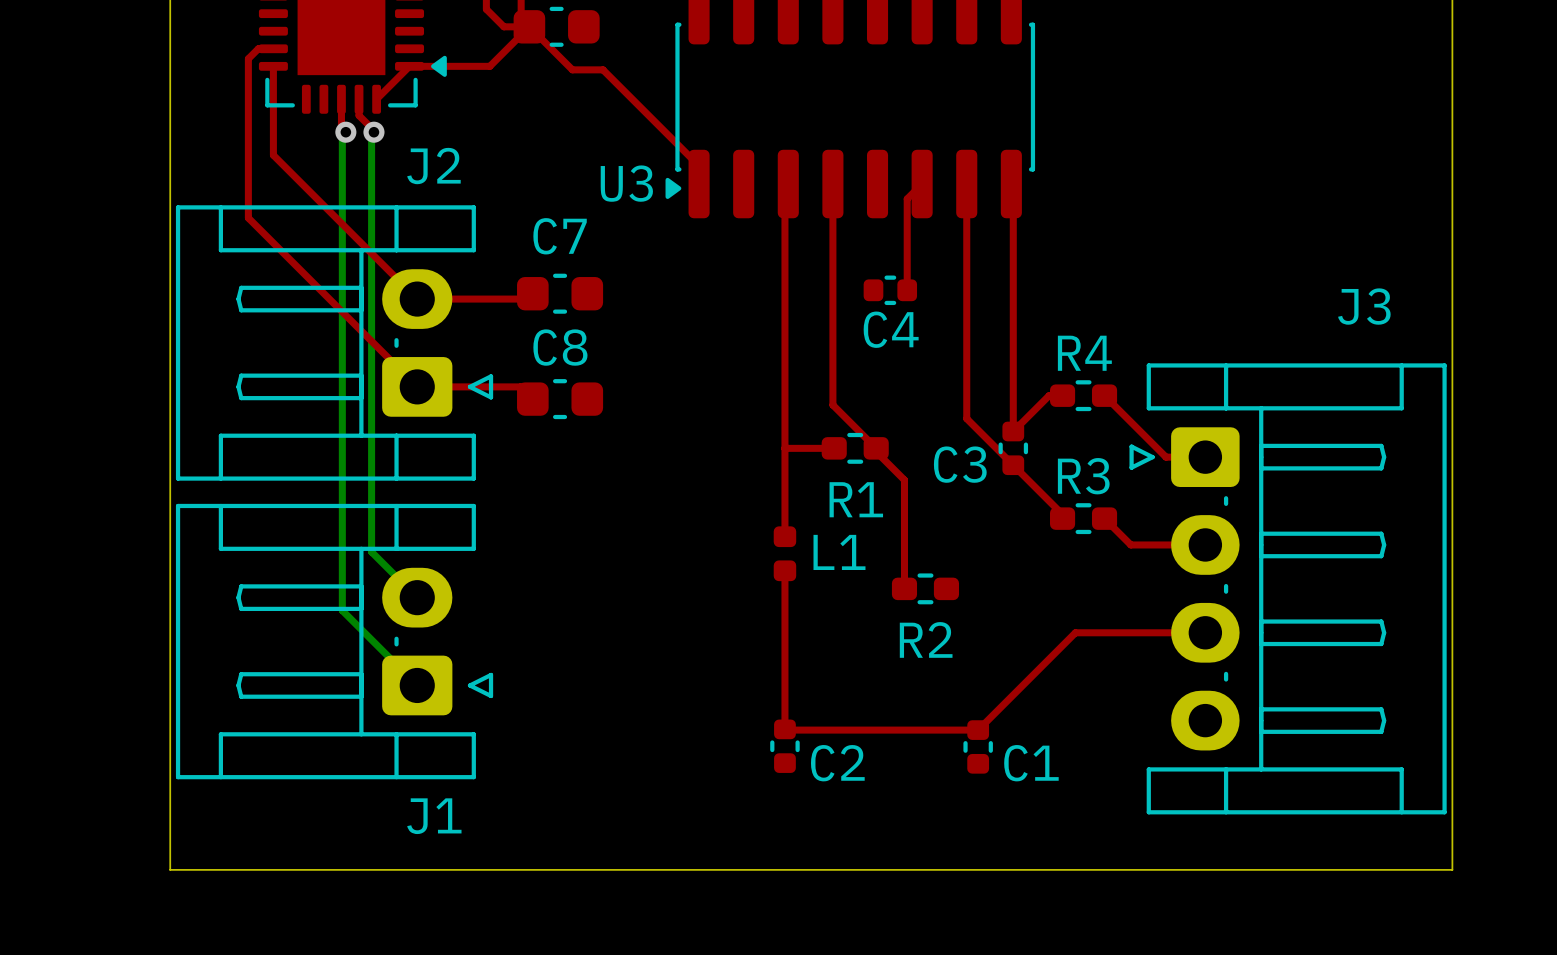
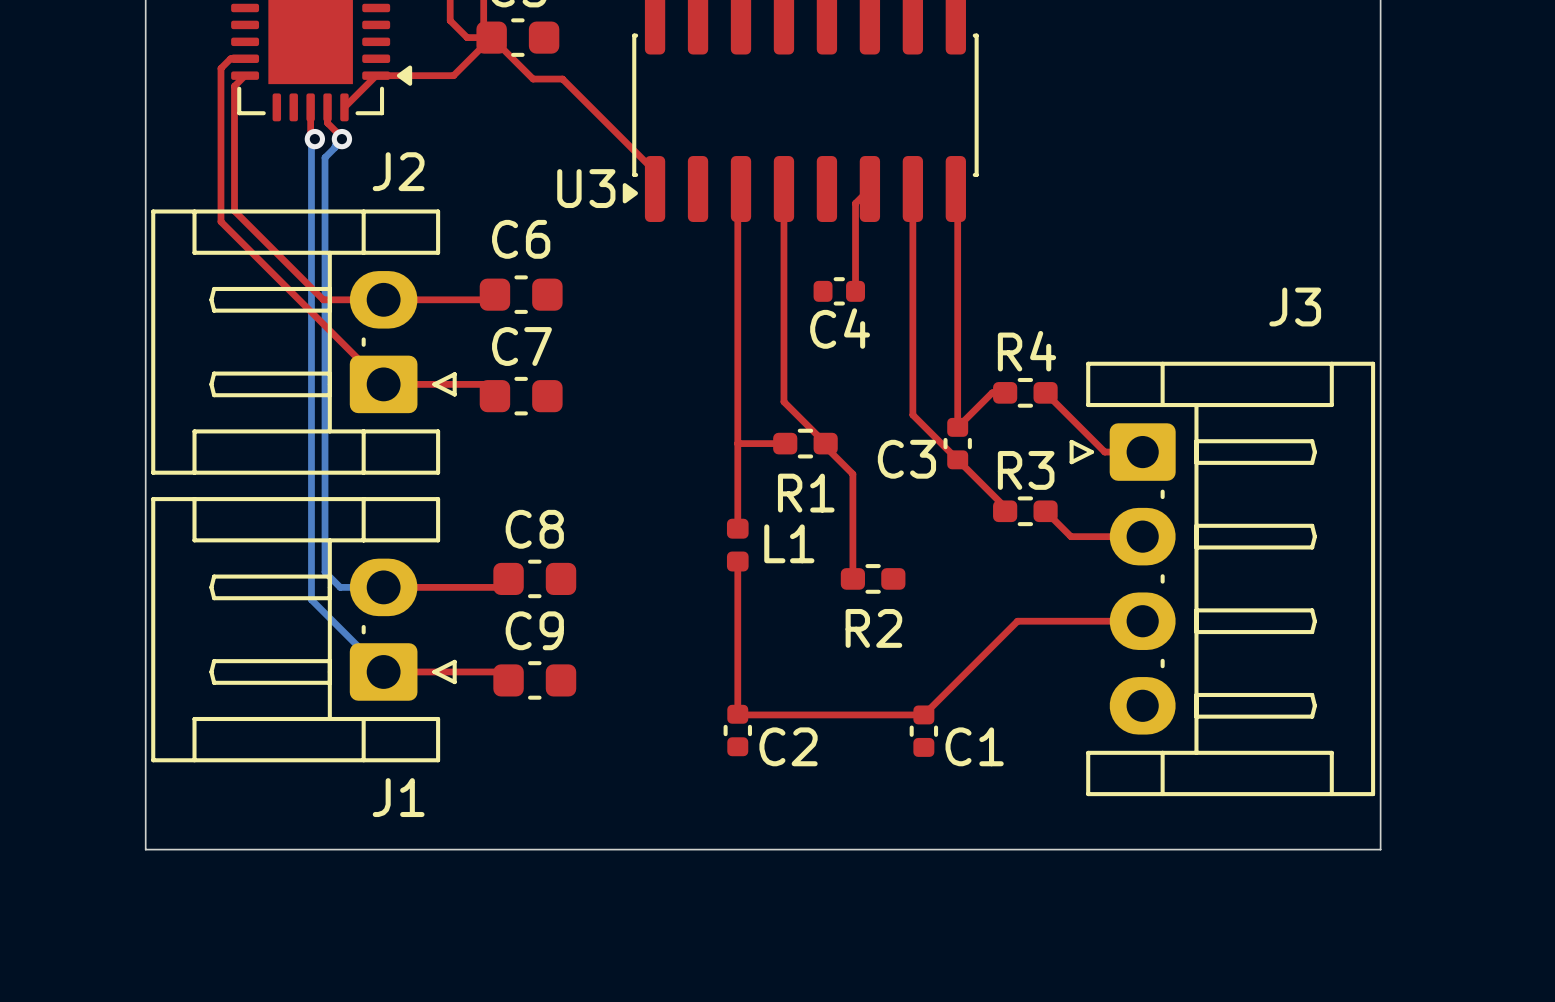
top track: (273, 66) (273, 155) (417, 299) -> (245, 75) (234, 86) (234, 210) (323, 299) (383, 299)
bottom track: (371, 134) (371, 551) (417, 597) -> (339, 141) (325, 157) (325, 572) (340, 587) (383, 587)
C7 name: C7 (560, 236) -> C6 (521, 239)
C8 name: C8 (560, 347) -> C7 (521, 346)
top track: none -> (508, 578) (500, 587) (383, 587)
C8: none -> (534, 578)
top track: none -> (383, 671) (500, 671) (508, 680)
C9: none -> (534, 680)

